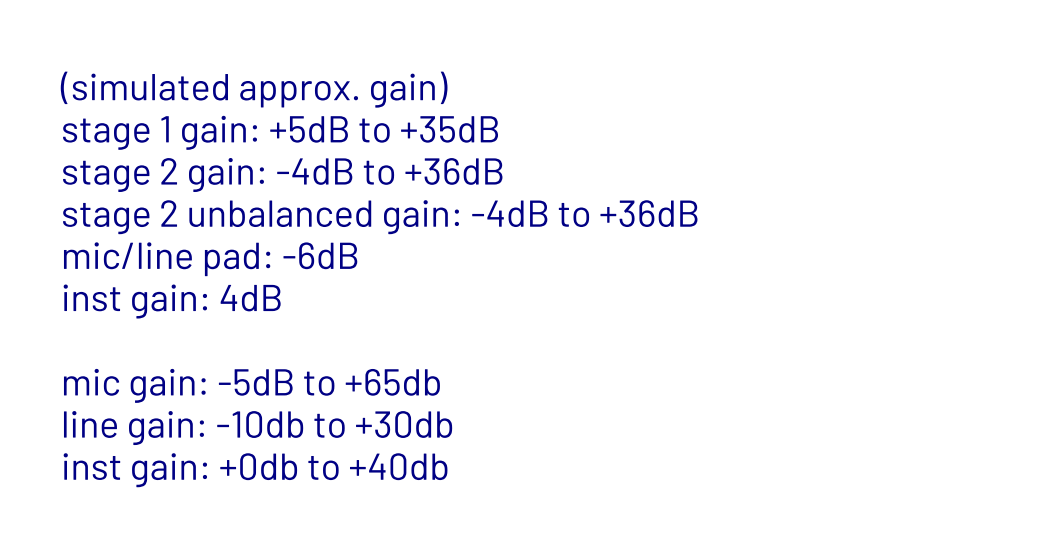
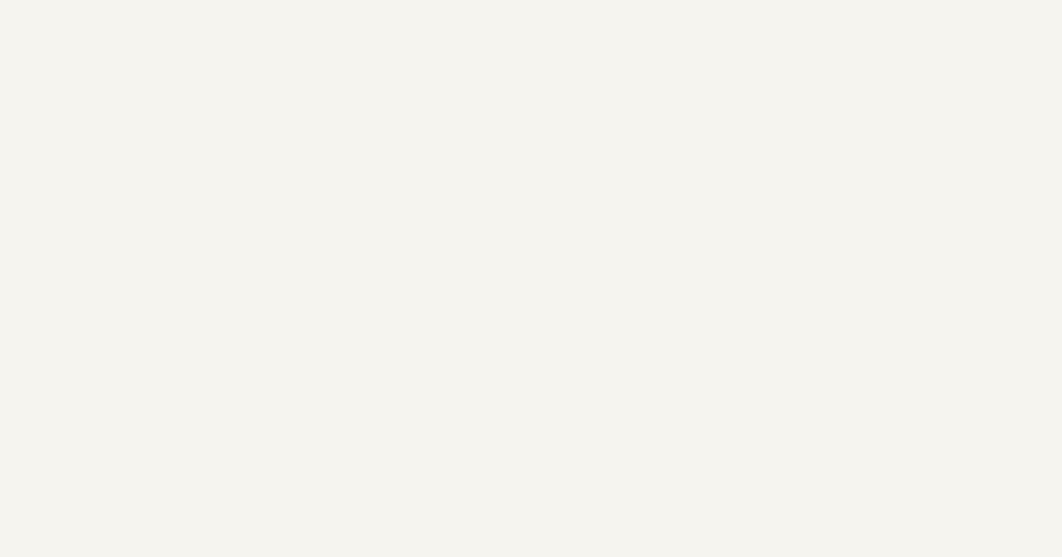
text: (simulated approx. gain) (254, 89) -> none
text: stage 1 gain: +5dB to +35dB (280, 132) -> none
text: stage 2 gain: -4dB to +36dB (282, 174) -> none
text: stage 2 unbalanced gain: -4dB to +36dB (380, 217) -> none
text: mic/line pad: -6dB (210, 259) -> none
text: inst gain: 4dB (172, 301) -> none
text: mic gain: -5dB to +65db (251, 385) -> none
text: line gain: -10db to +30db (258, 428) -> none
text: inst gain: +0db to +40db (255, 470) -> none

